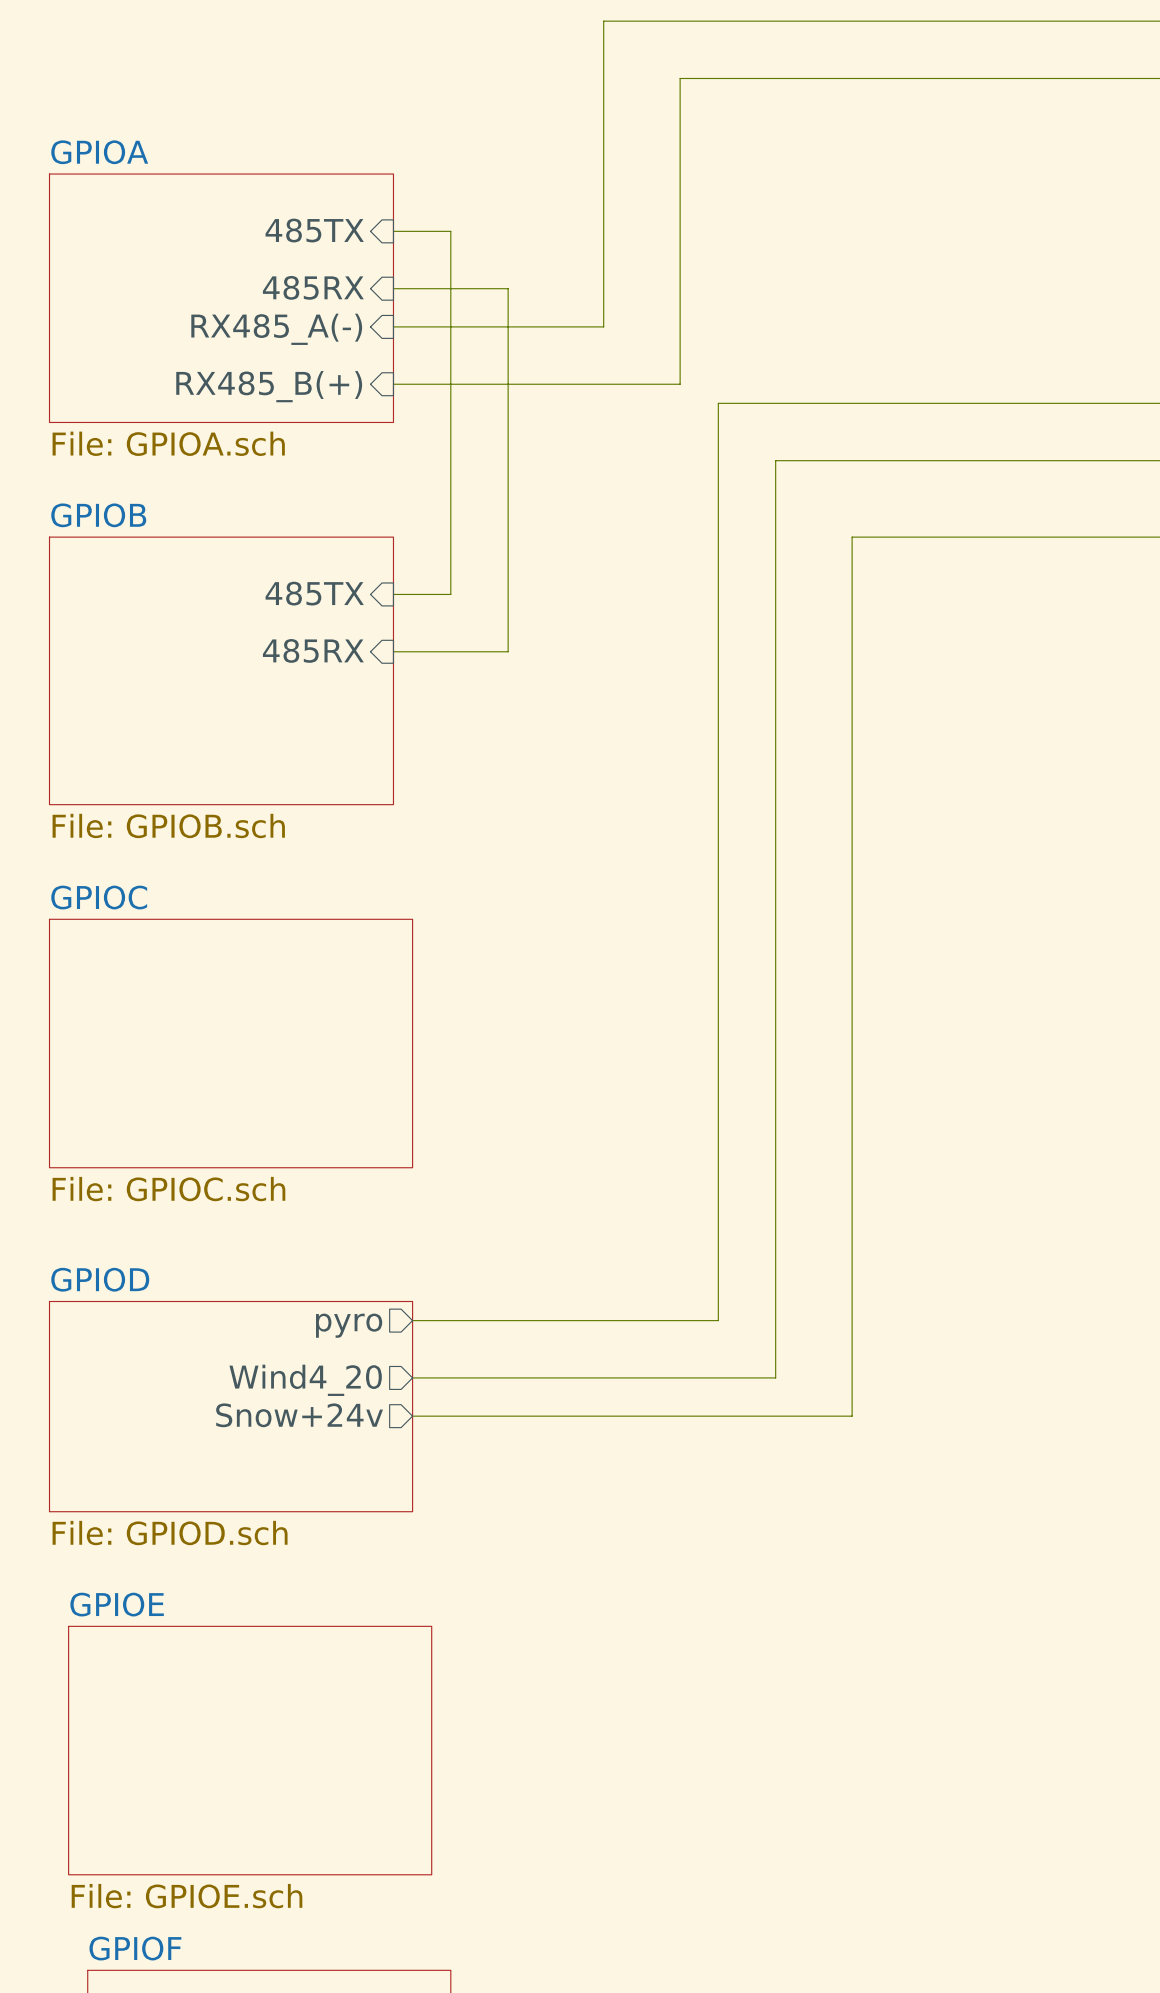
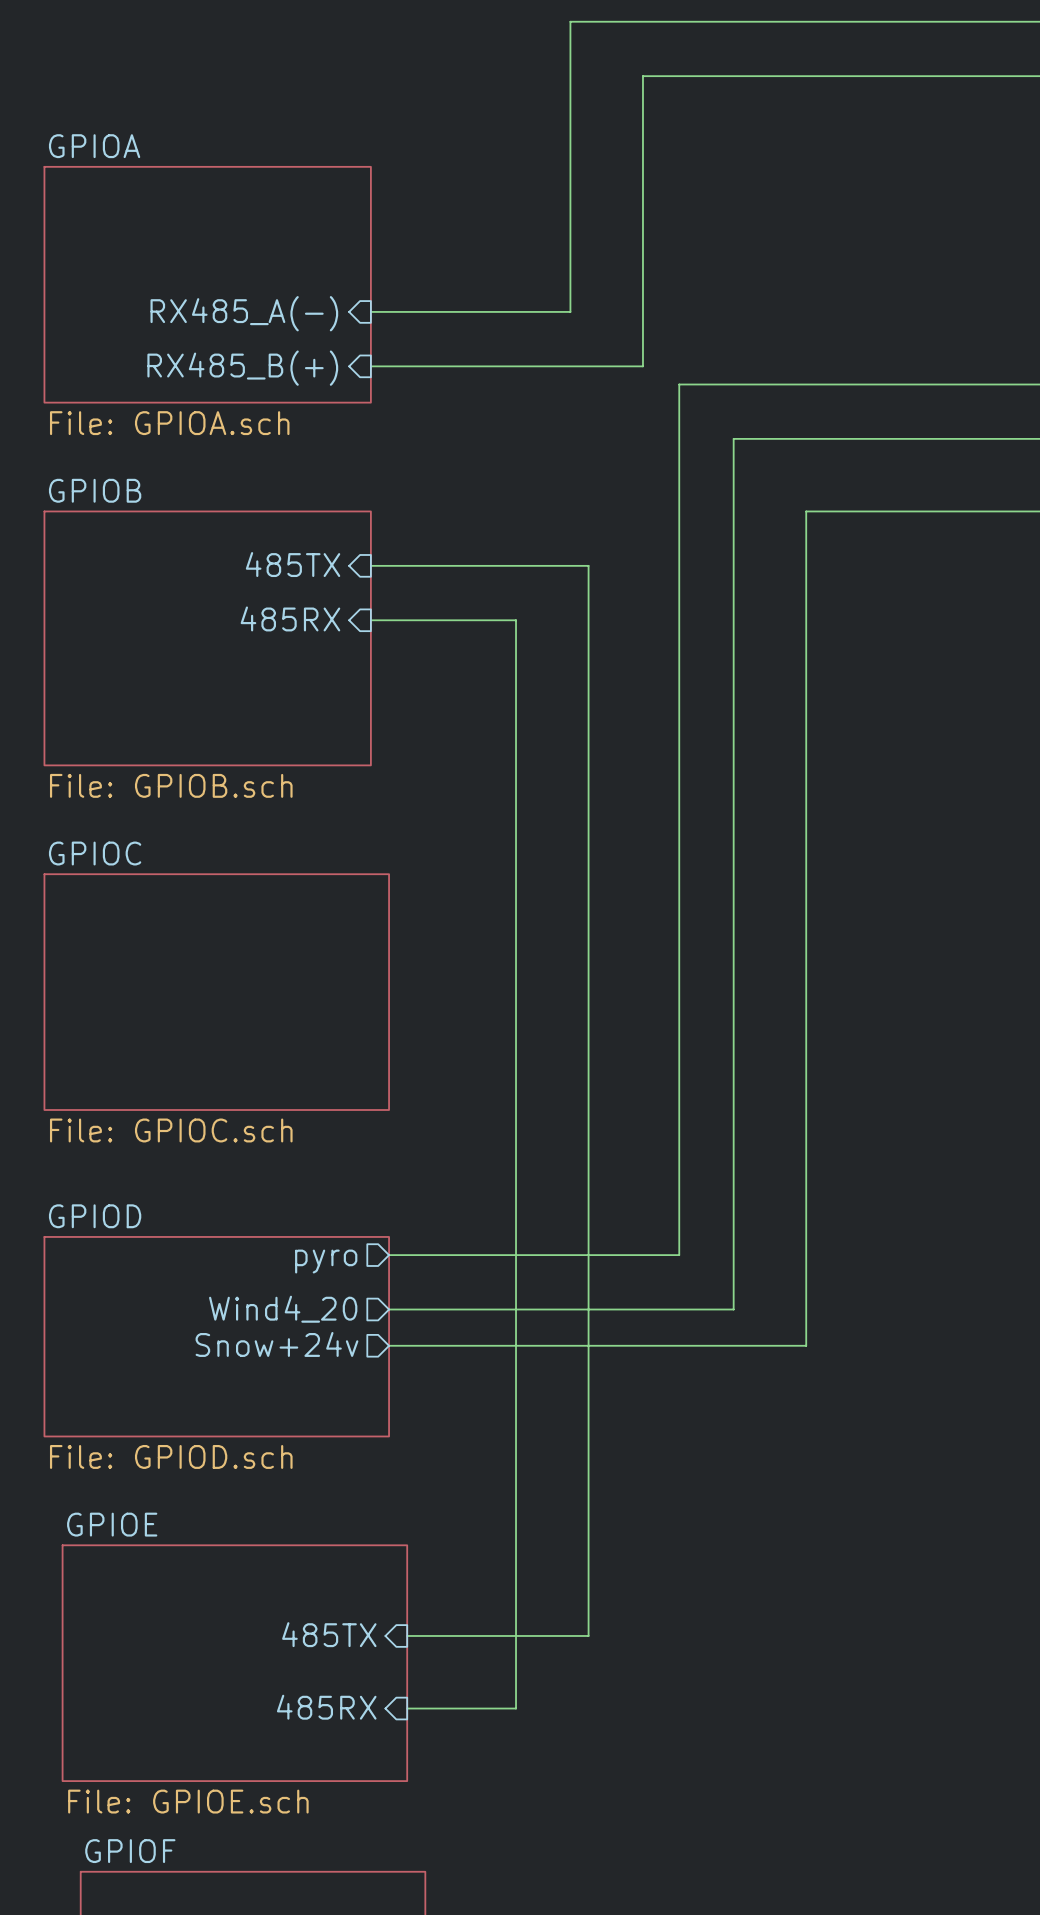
sheet pin: 485TX (314, 230) -> none
wire: (393, 231) (450, 231) (450, 594) -> (407, 1635) (588, 1635) (588, 565) (425, 565)
sheet pin: 485RX (313, 287) -> none
wire: (393, 288) (508, 288) (508, 651) -> (407, 1708) (516, 1708) (516, 620) (479, 620)
sheet pin: none -> 485TX (329, 1634)
sheet pin: none -> 485RX (326, 1707)

